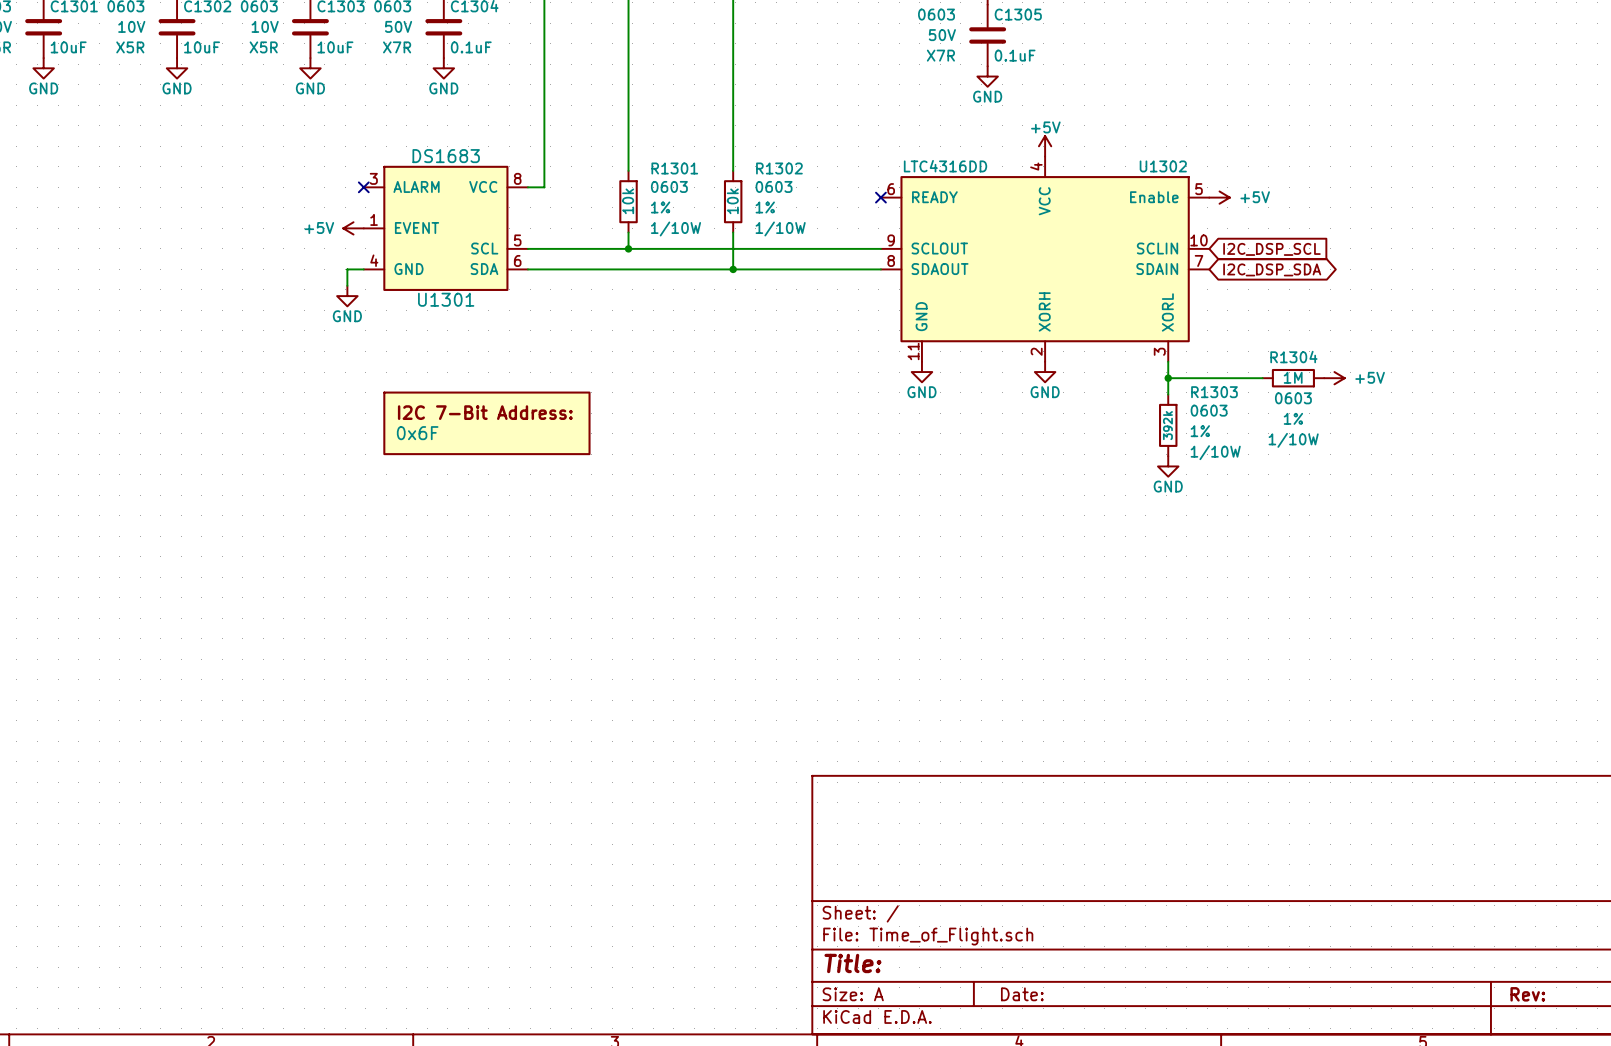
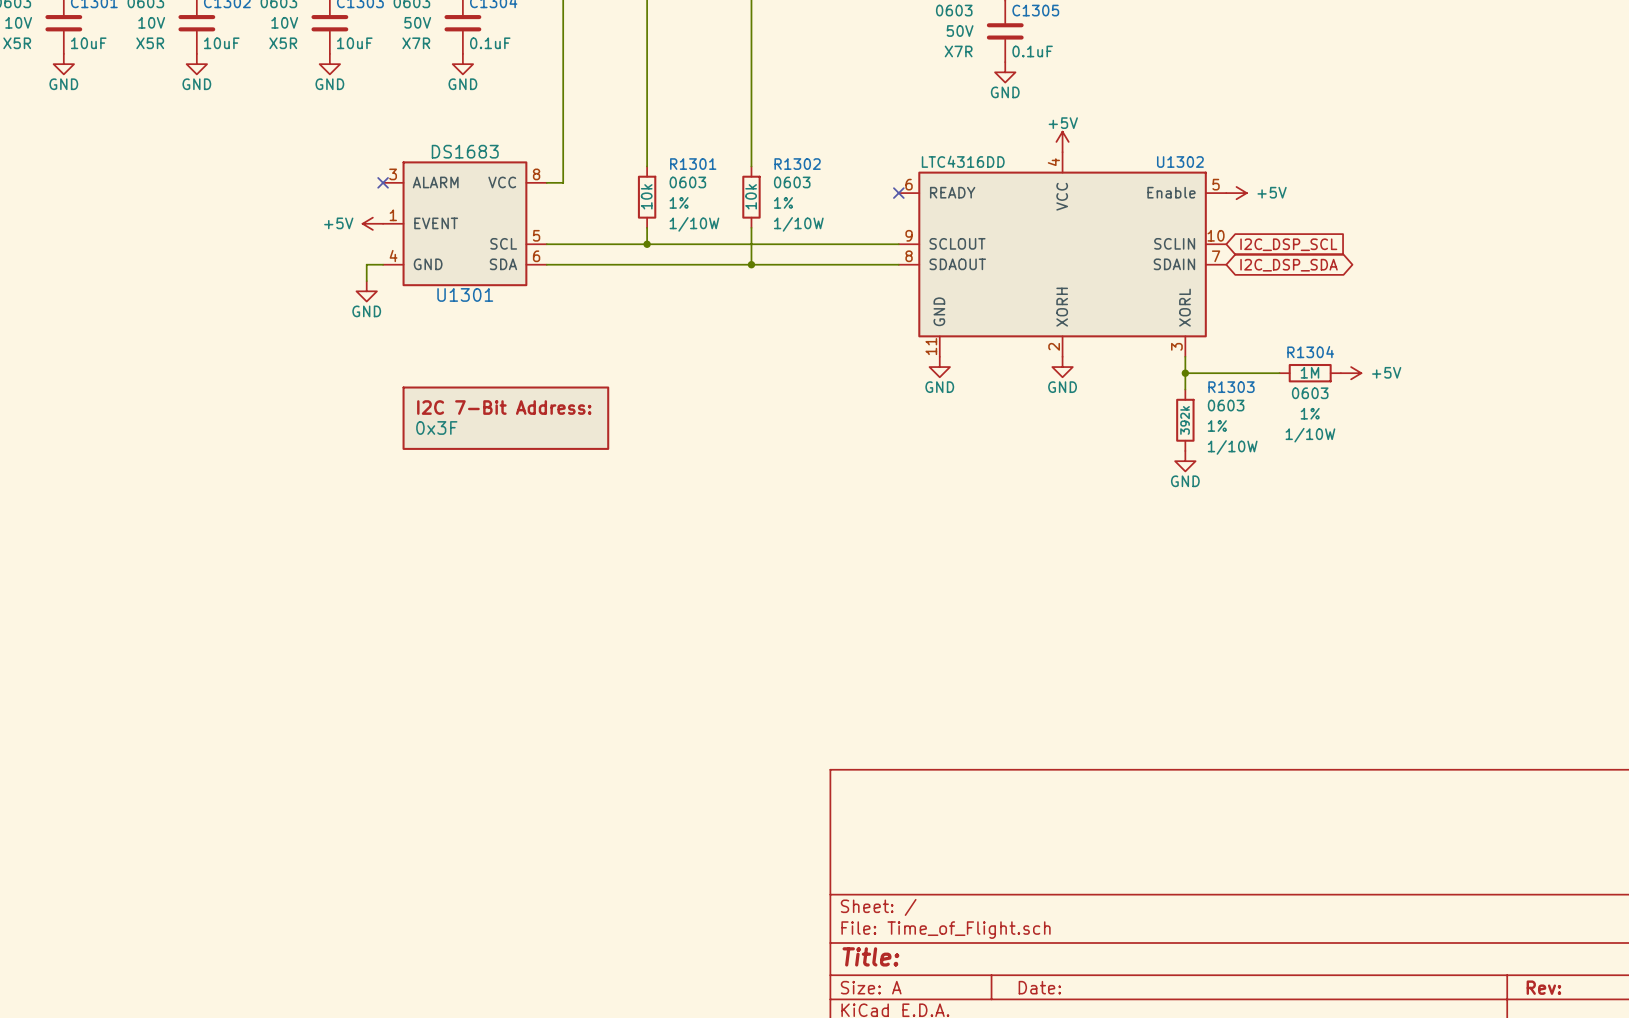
part value: 0x6F (417, 433) -> 0x3F (436, 427)

